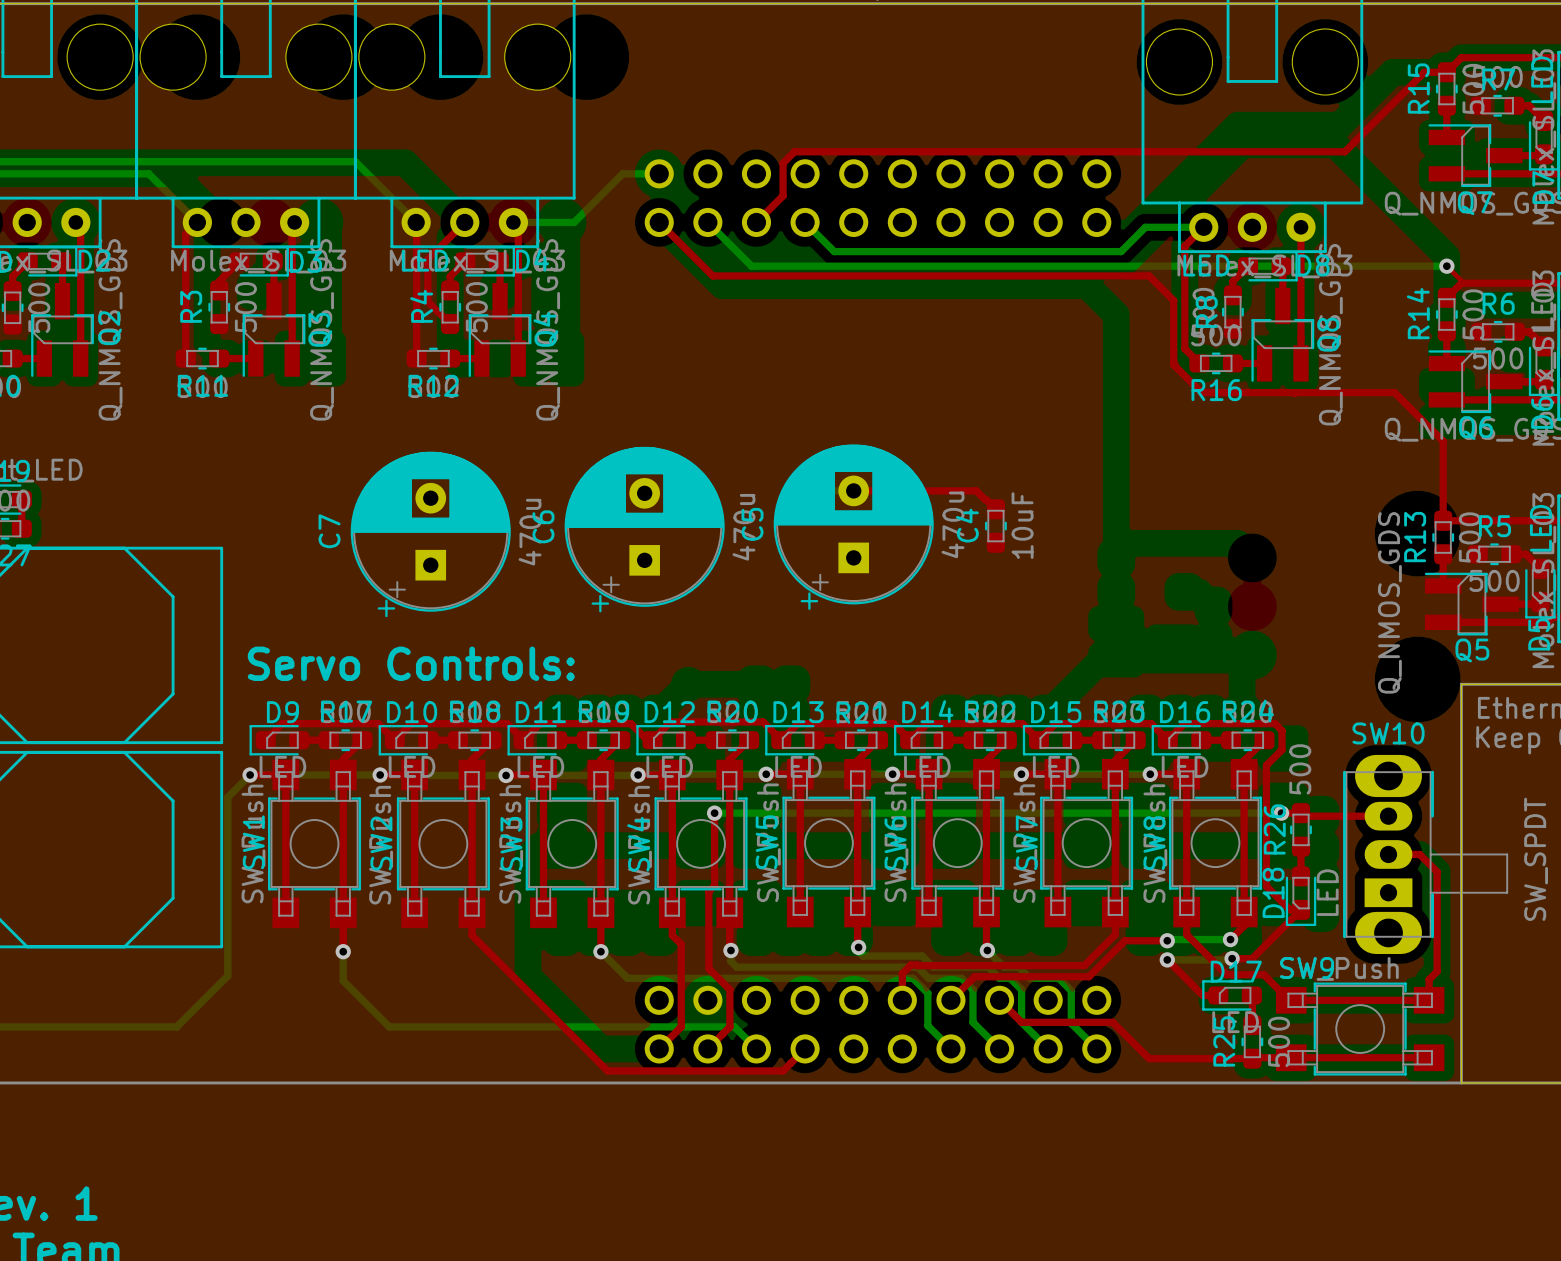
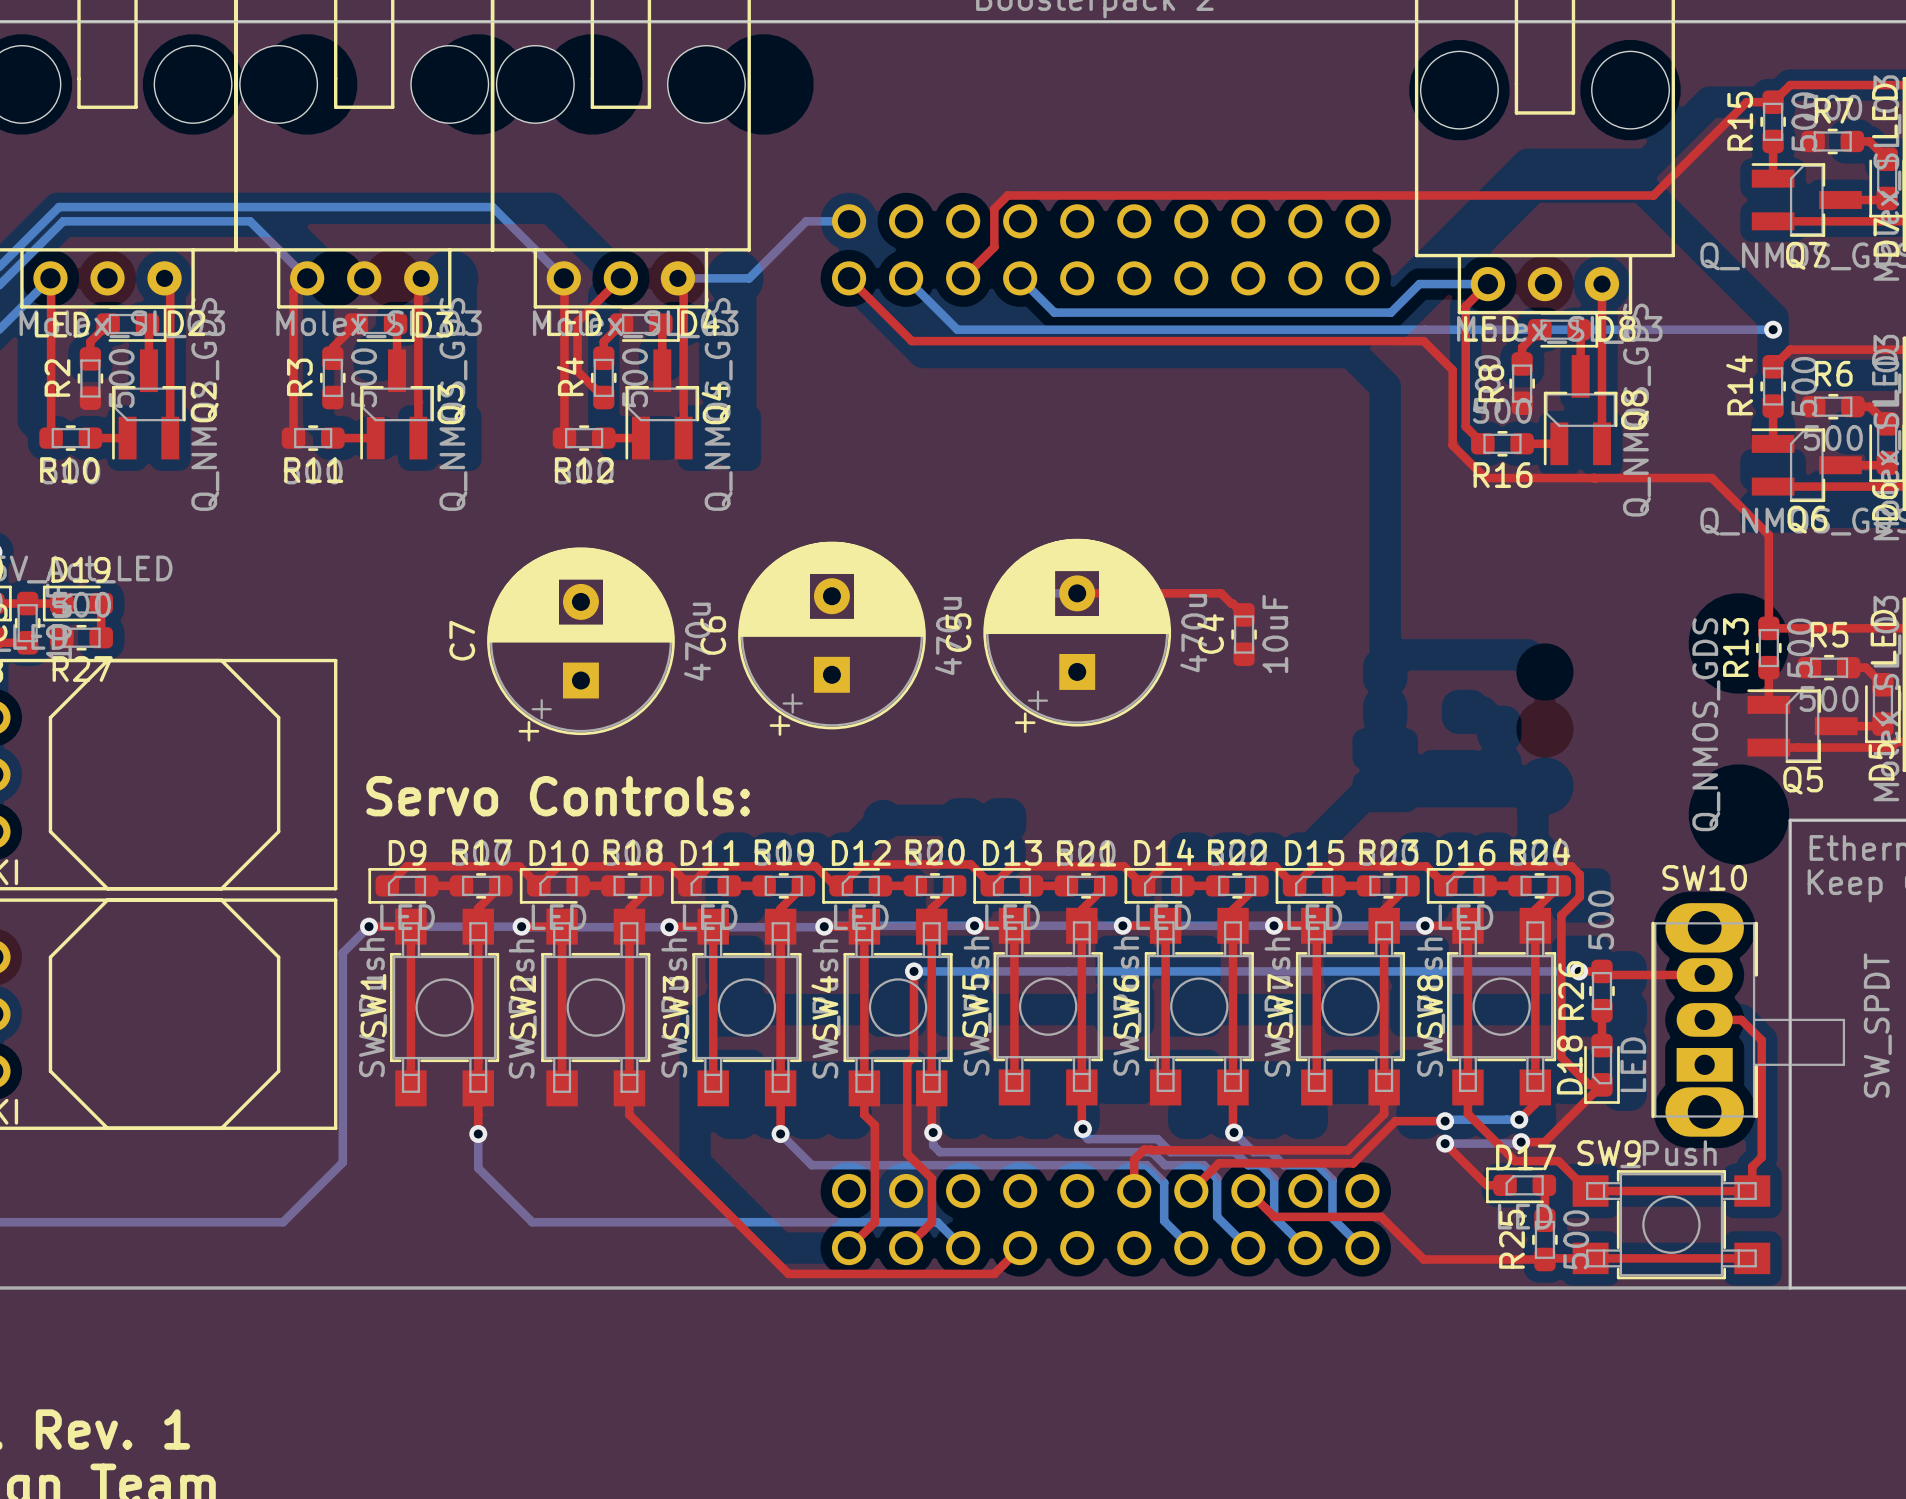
top track: (1446, 266) (1461, 280) (1461, 283) -> none

